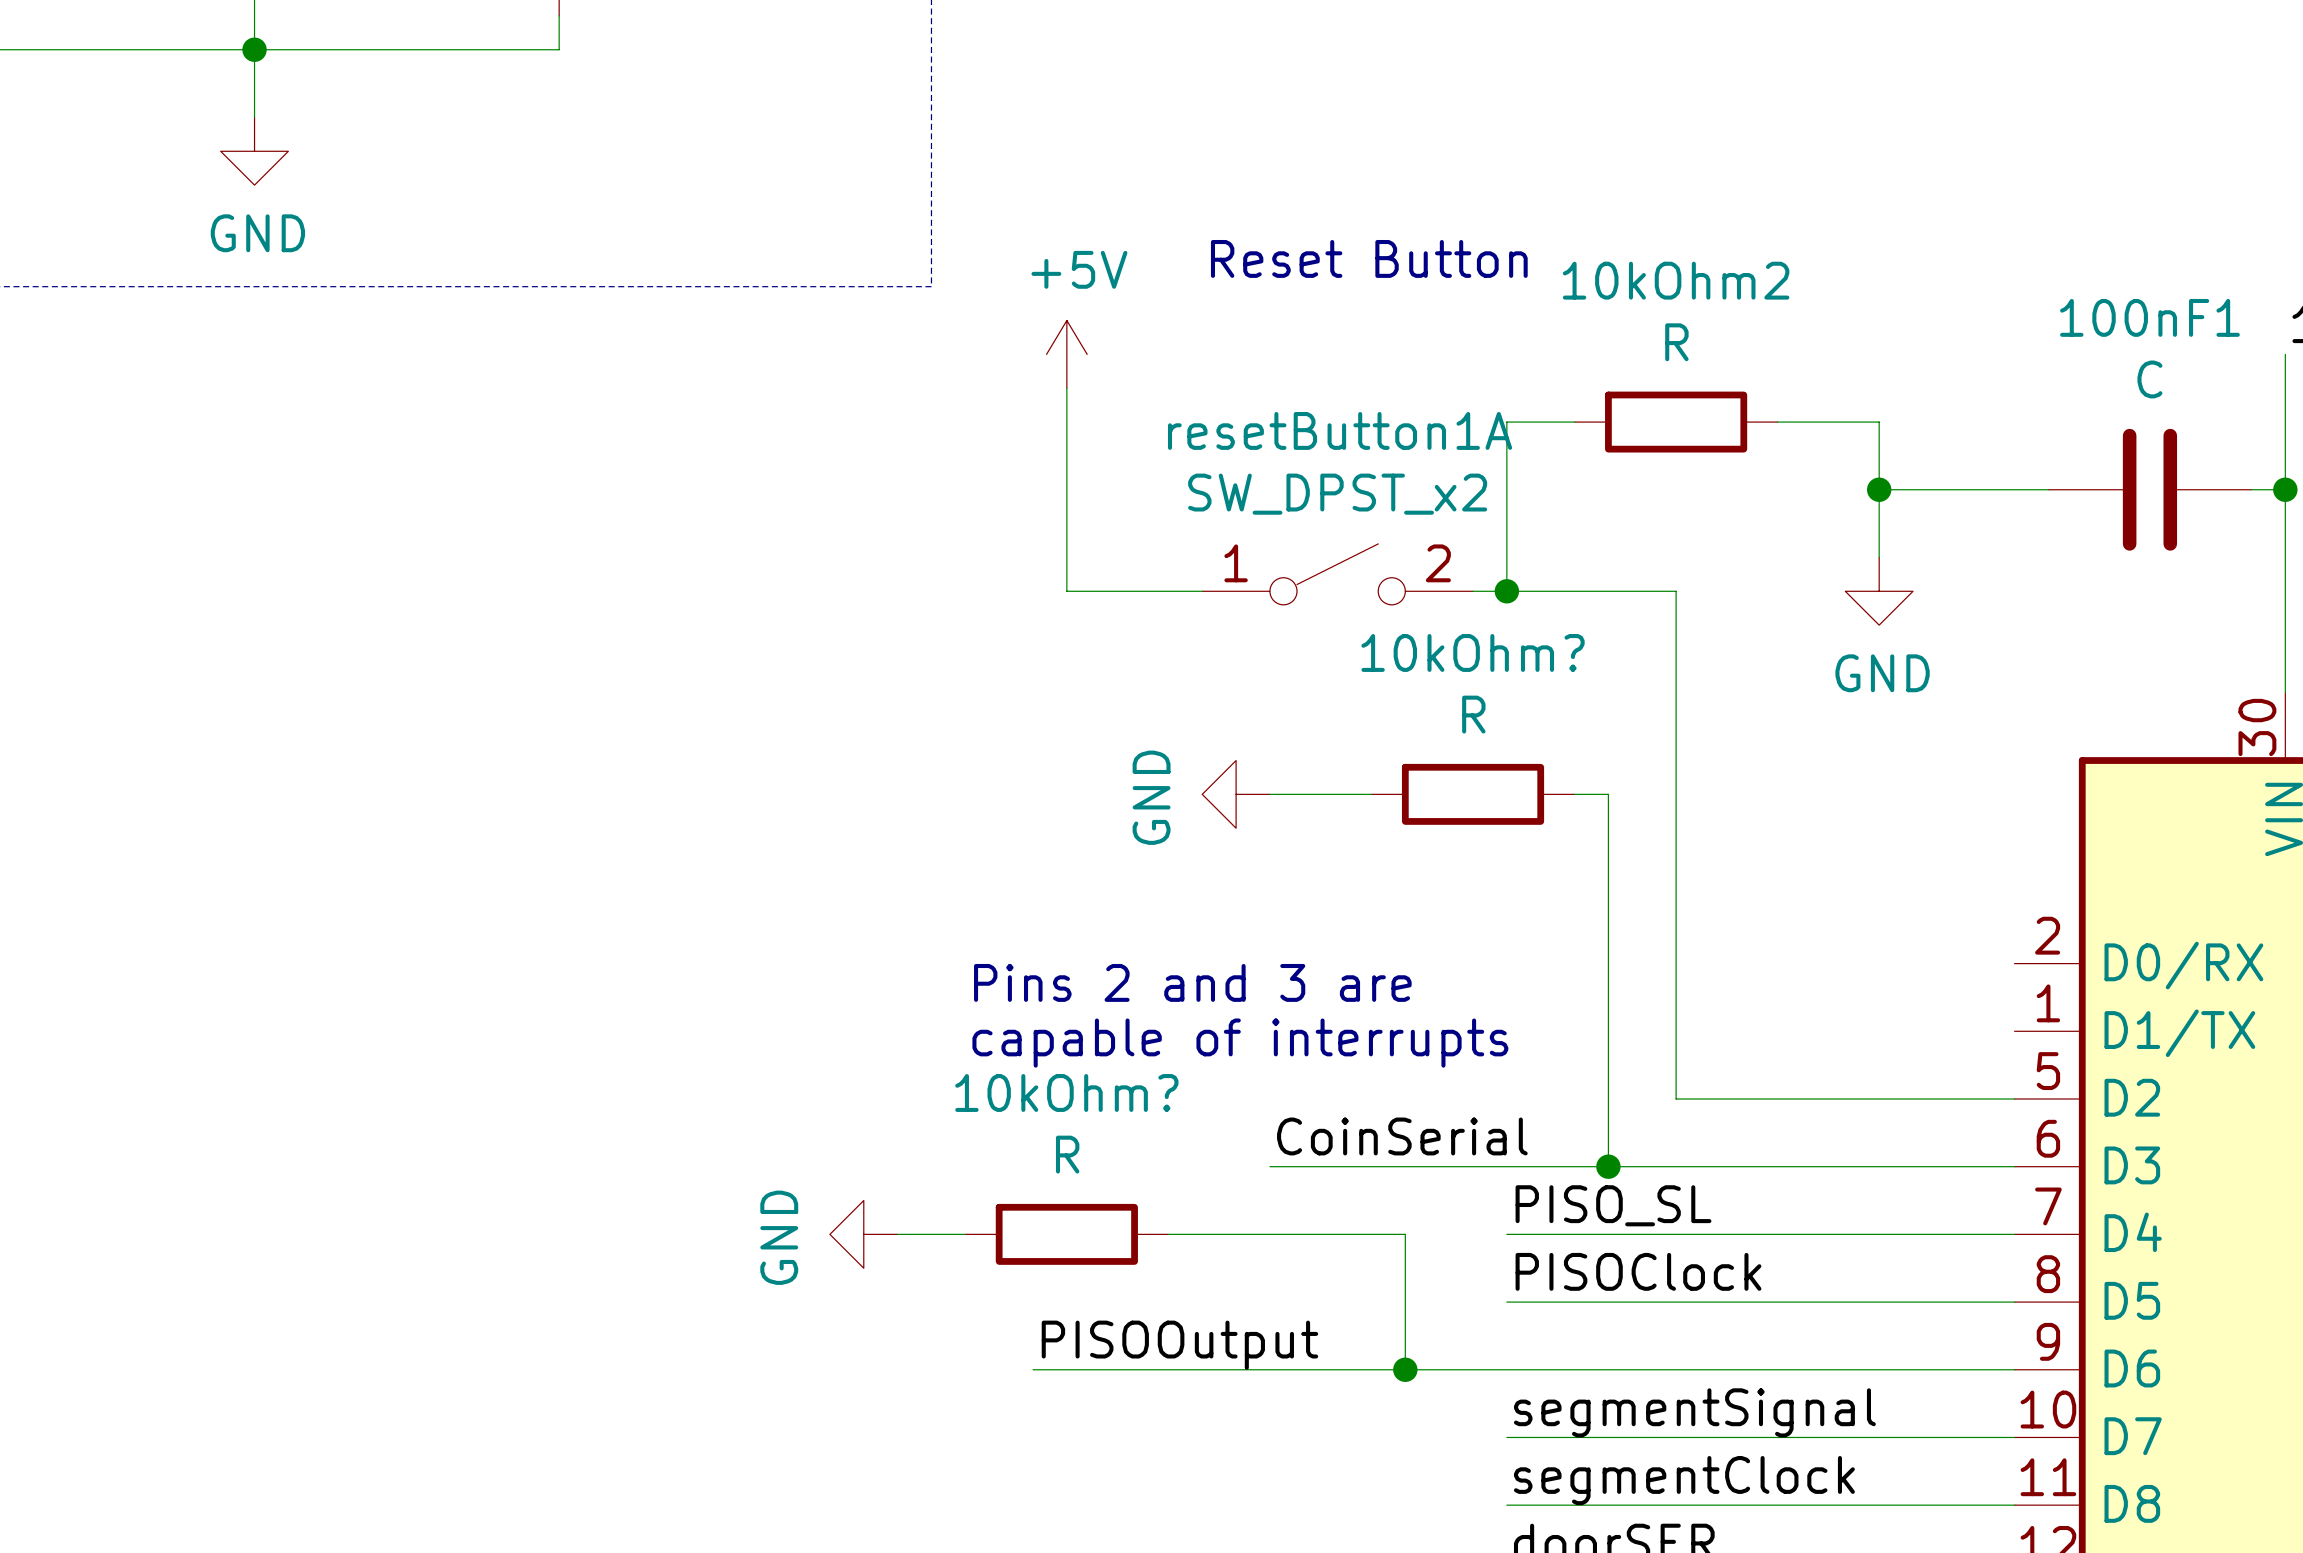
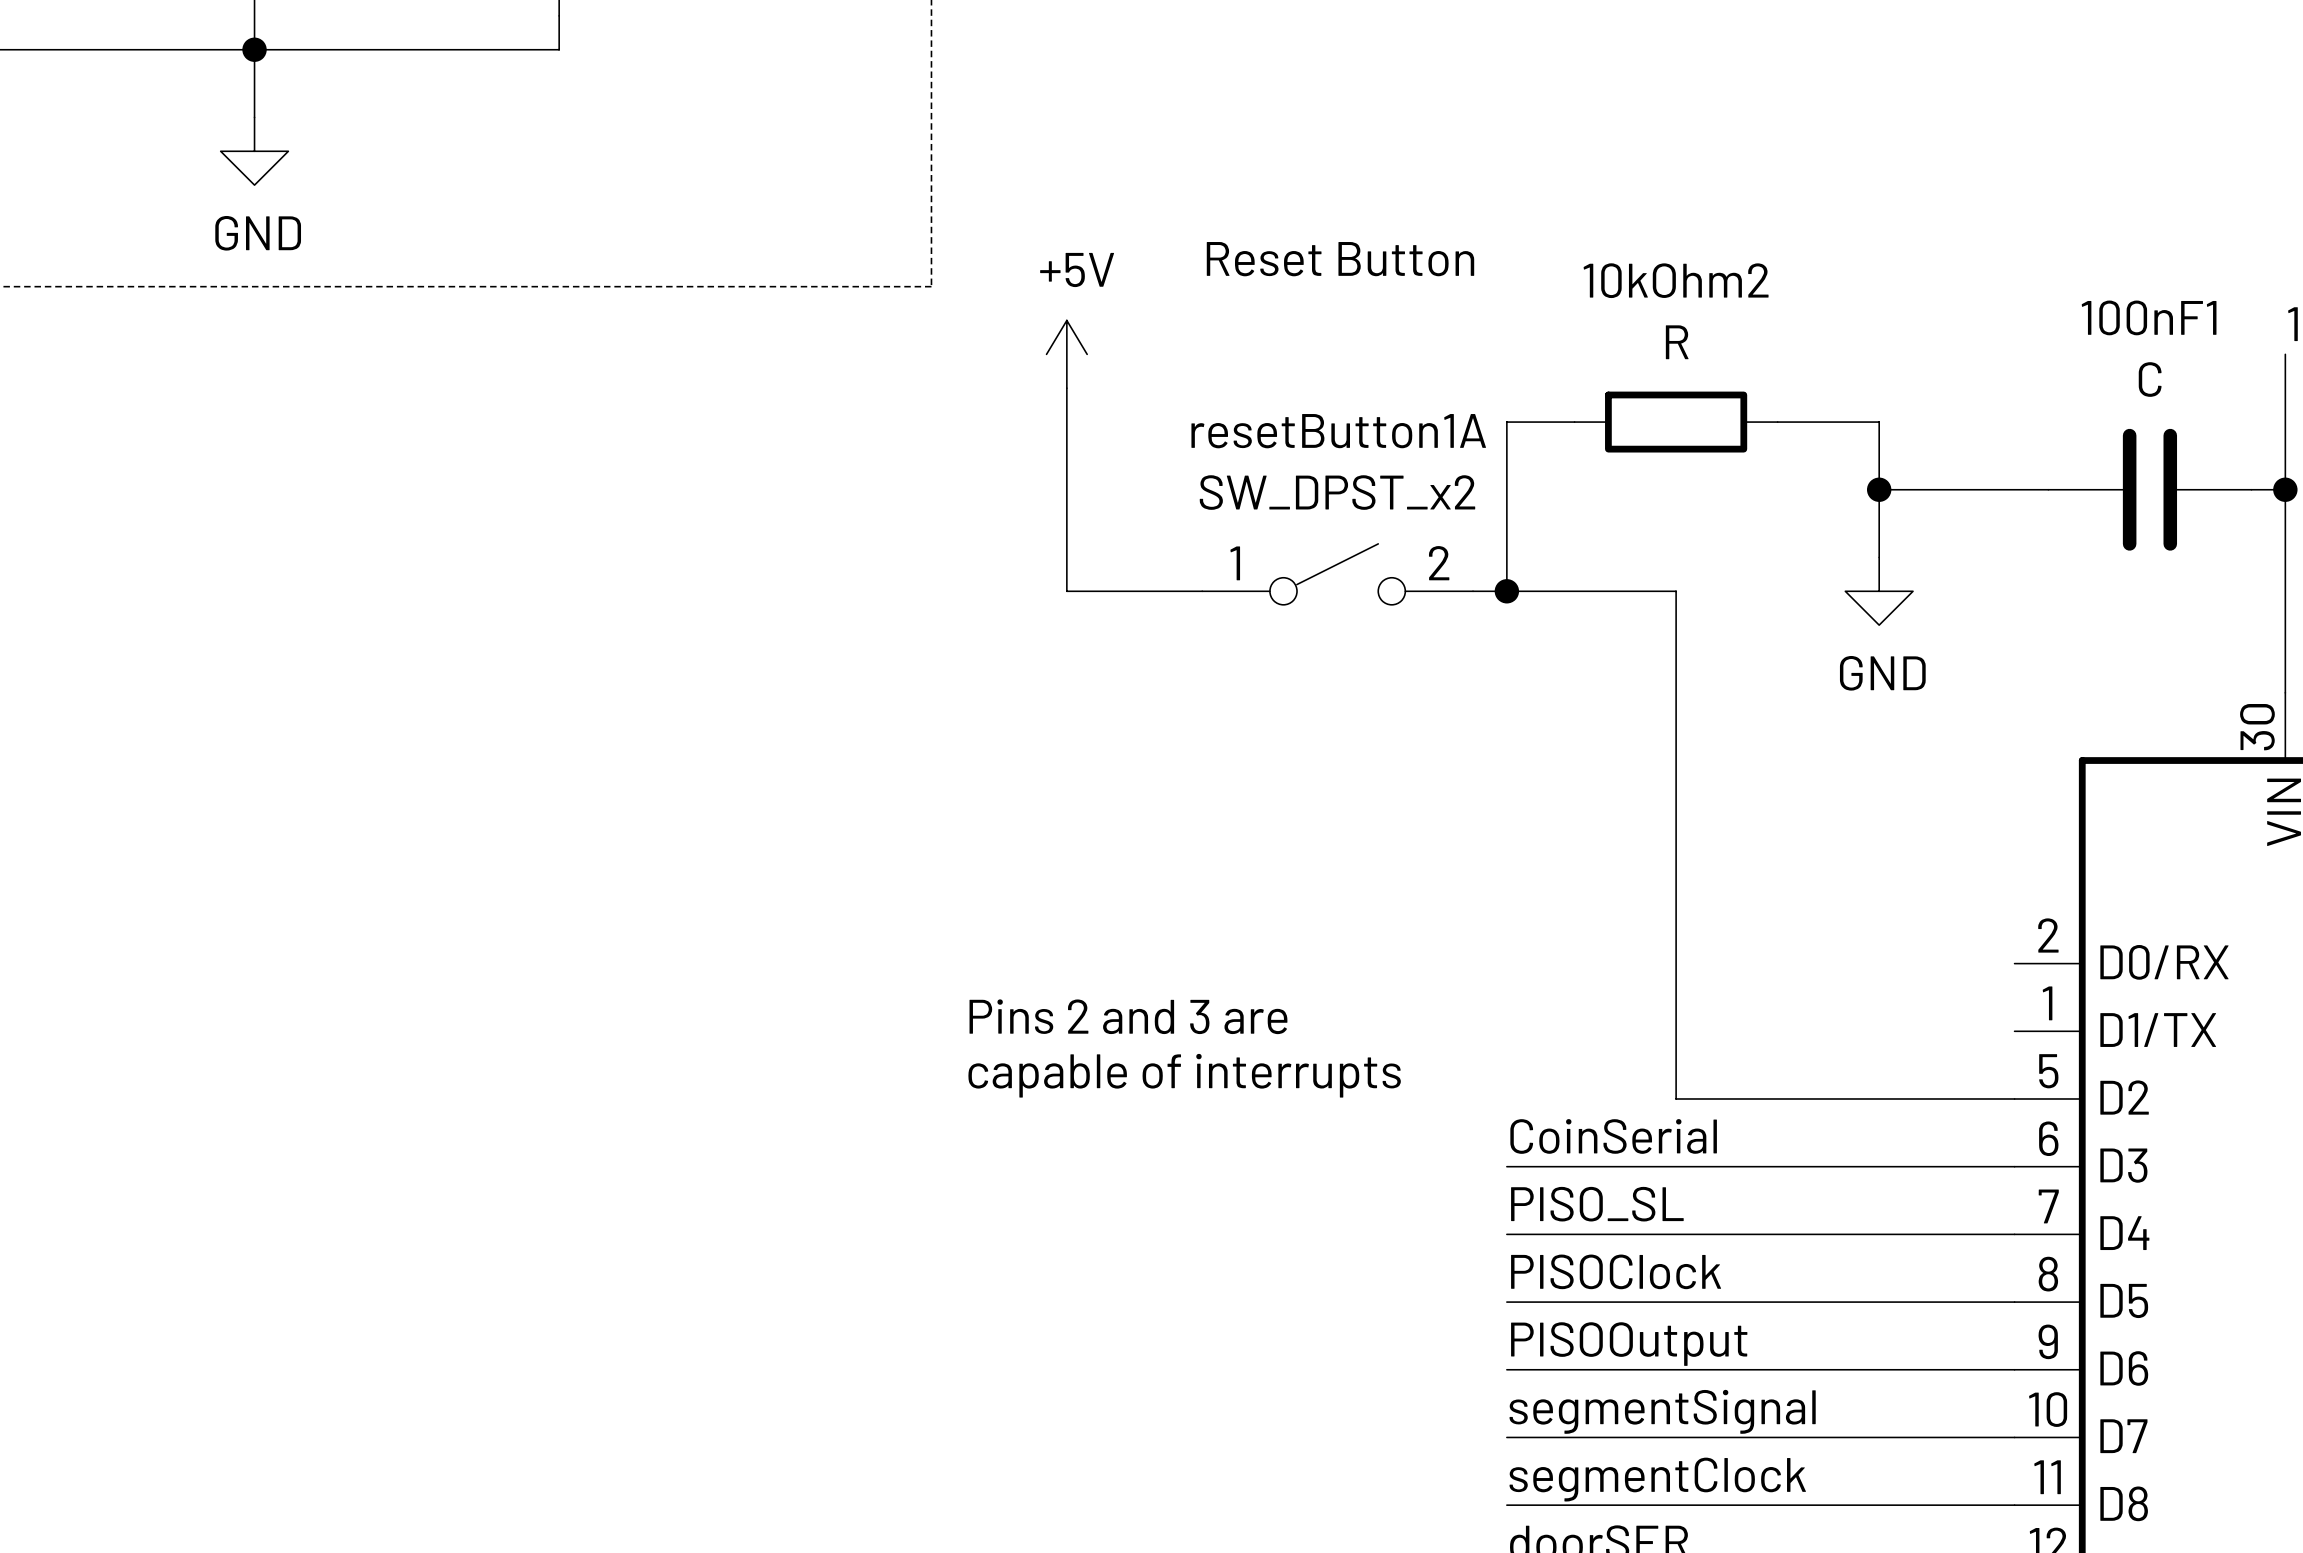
power symbol: GND (1236, 794) -> none
wire: (1269, 794) (1371, 794) -> none
10kOhm?: R (1473, 794) -> none
wire: (1574, 794) (1608, 794) (1608, 1166) -> none
text position: Pins 2 and 3 are (1192, 982) -> Pins 2 and 3 are (1128, 1016)
text position: capable of interrupts (1240, 1043) -> capable of interrupts (1184, 1075)
label position: CoinSerial (1402, 1136) -> CoinSerial (1613, 1136)
wire: (1269, 1166) (1506, 1166) -> none
junction: (1608, 1166) -> none
power symbol: GND (863, 1234) -> none
wire: (897, 1234) (965, 1234) -> none
10kOhm?: R (1066, 1234) -> none
wire: (1168, 1234) (1405, 1234) (1405, 1369) -> none
label position: PISOOutput (1179, 1345) -> PISOOutput (1629, 1344)
wire: (1033, 1369) (1506, 1369) -> none
junction: (1405, 1369) -> none

